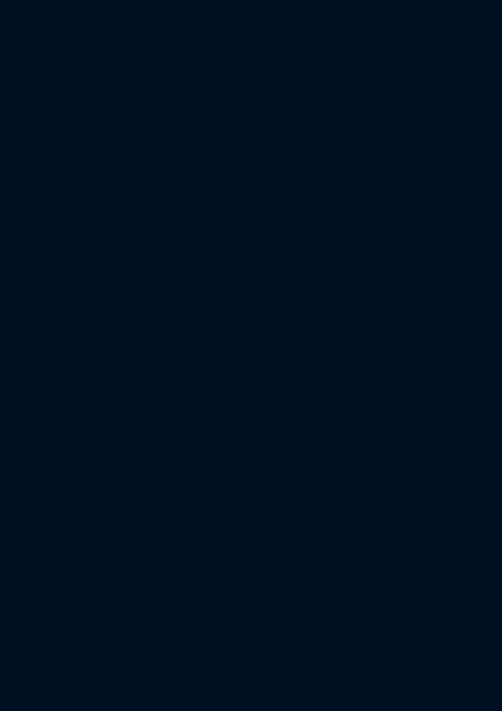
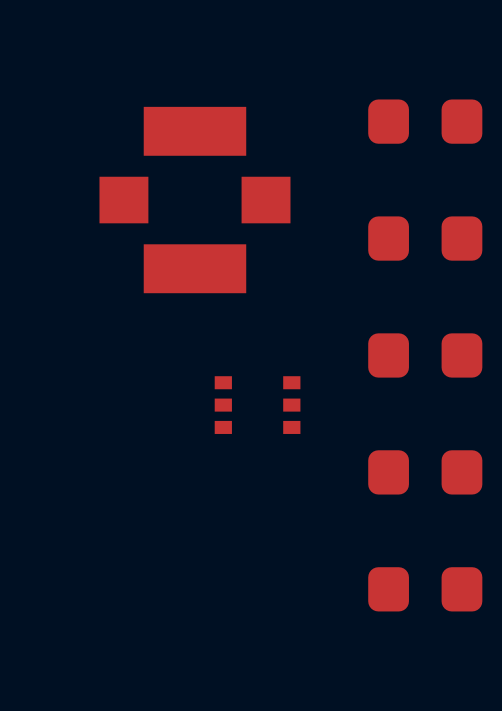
part: none -> (425, 121)
part: none -> (194, 200)
part: none -> (425, 238)
part: none -> (425, 355)
part: none -> (257, 405)
part: none -> (425, 472)
part: none -> (425, 589)

